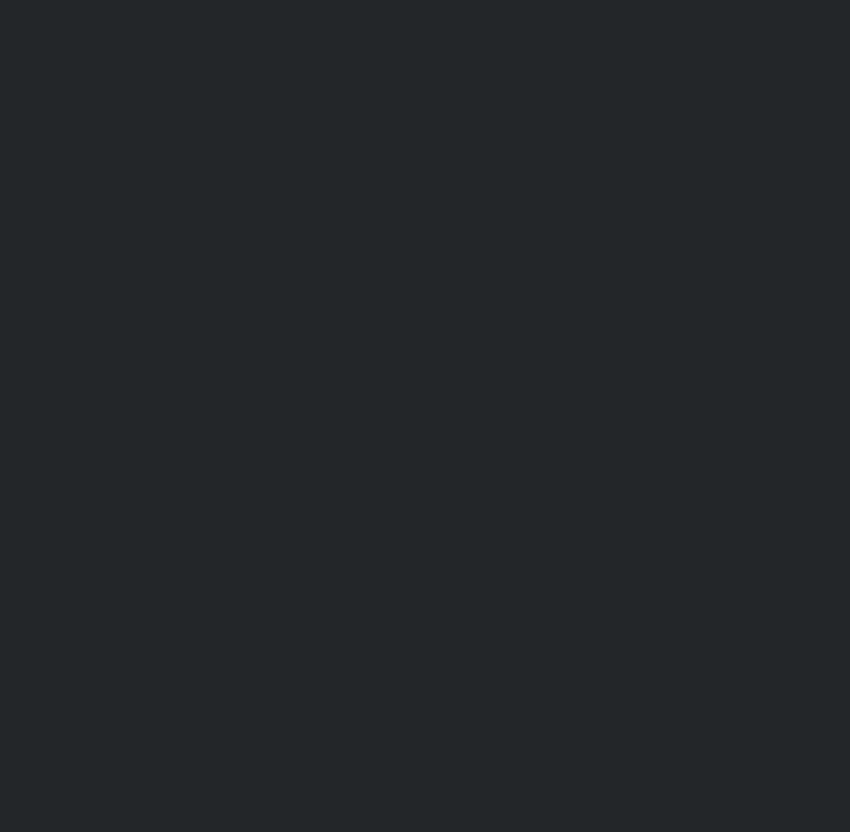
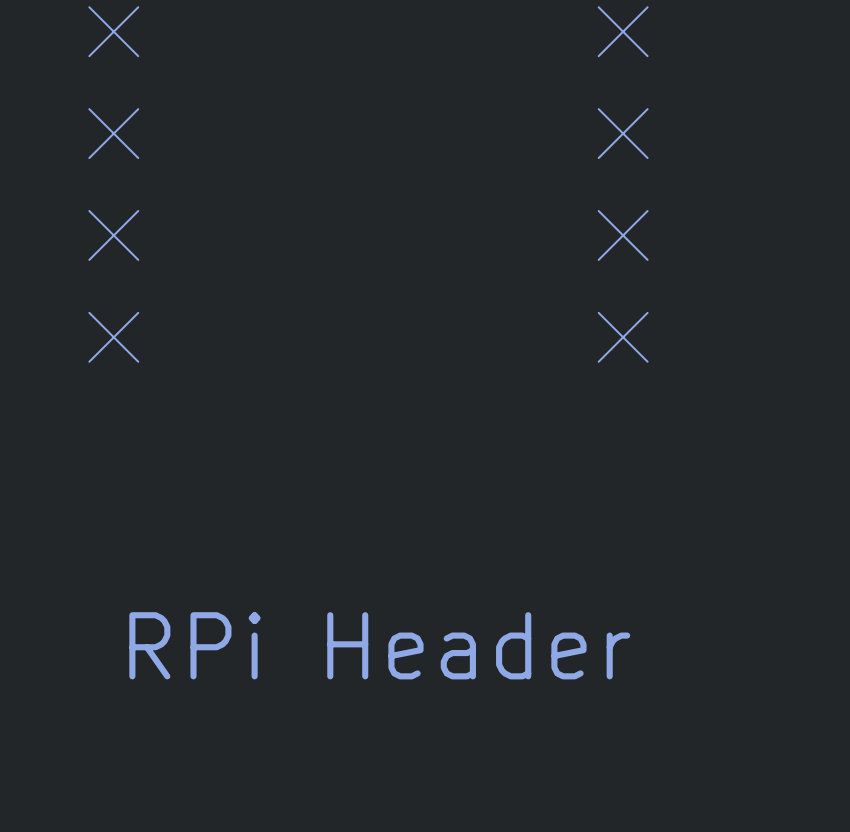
no-connect mark: none -> (113, 31)
no-connect mark: none -> (623, 31)
no-connect mark: none -> (113, 133)
no-connect mark: none -> (623, 133)
no-connect mark: none -> (113, 235)
no-connect mark: none -> (623, 235)
no-connect mark: none -> (113, 337)
no-connect mark: none -> (623, 337)
text: none -> RPi Header (379, 645)

